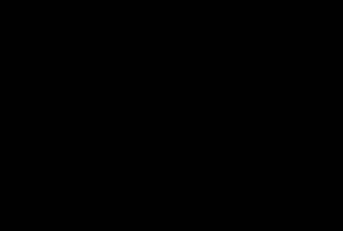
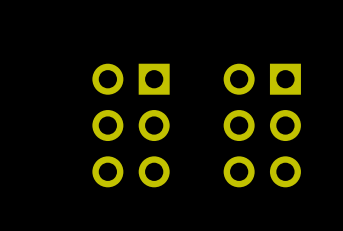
part: none -> (131, 125)
part: none -> (262, 125)

